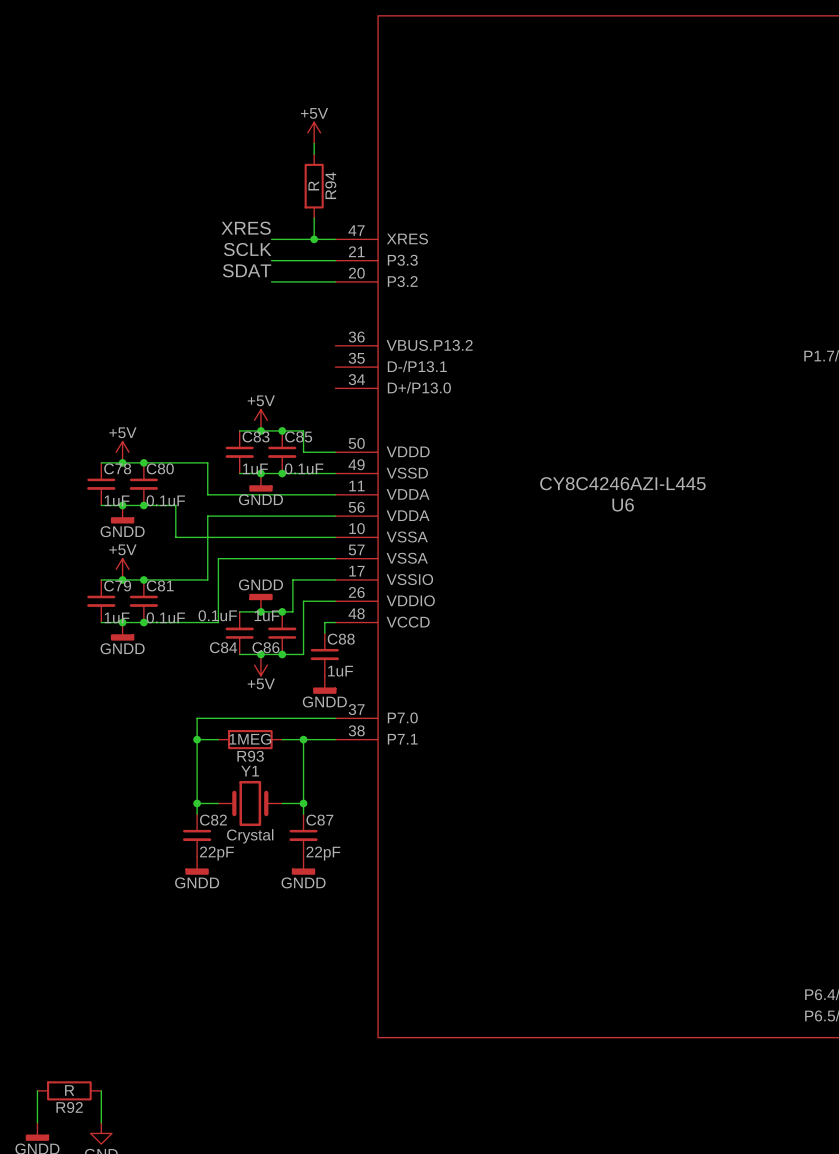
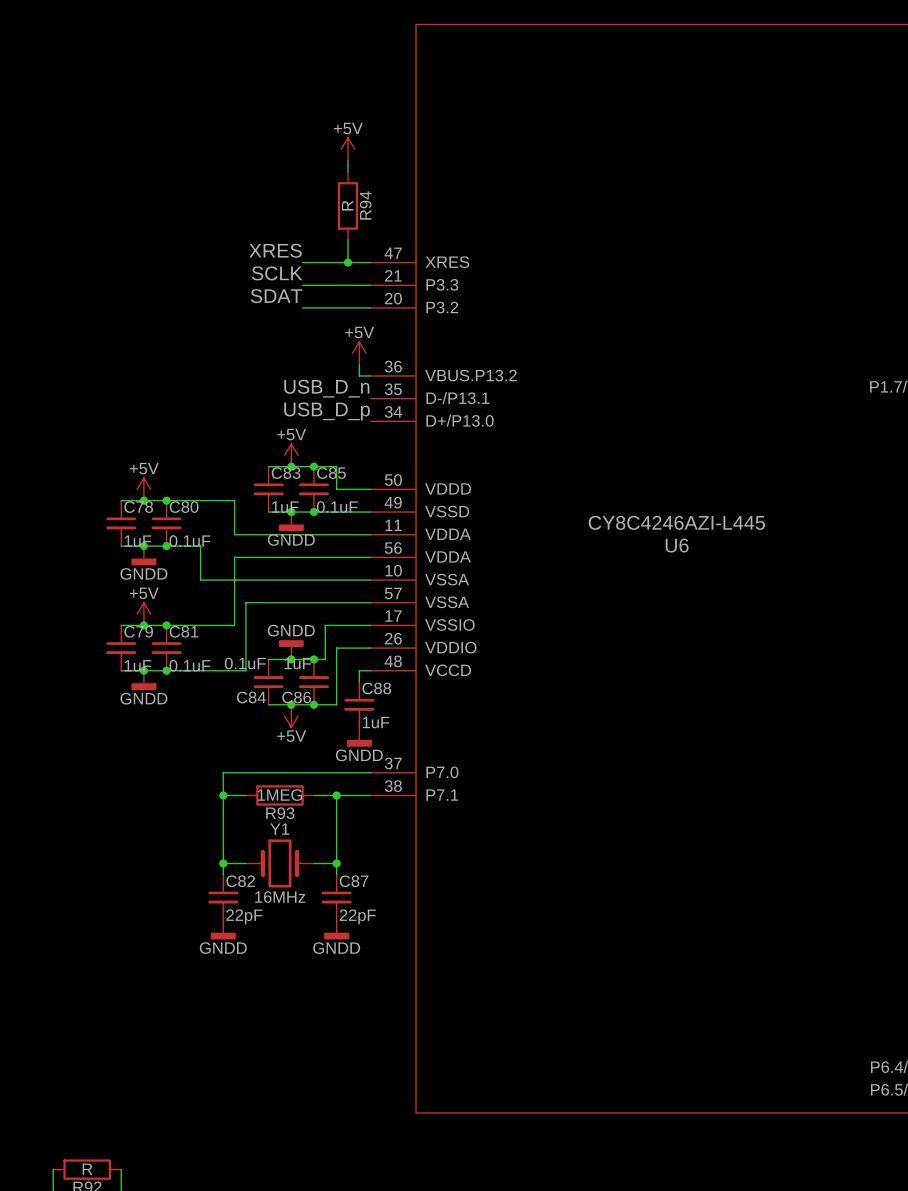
power symbol: none -> +5V (359, 353)
wire: none -> (359, 364) (359, 375) (370, 375)
label: none -> USB_D_n (326, 388)
label: none -> USB_D_p (327, 411)
Y1 value: Crystal (250, 836) -> 16MHz (280, 897)

